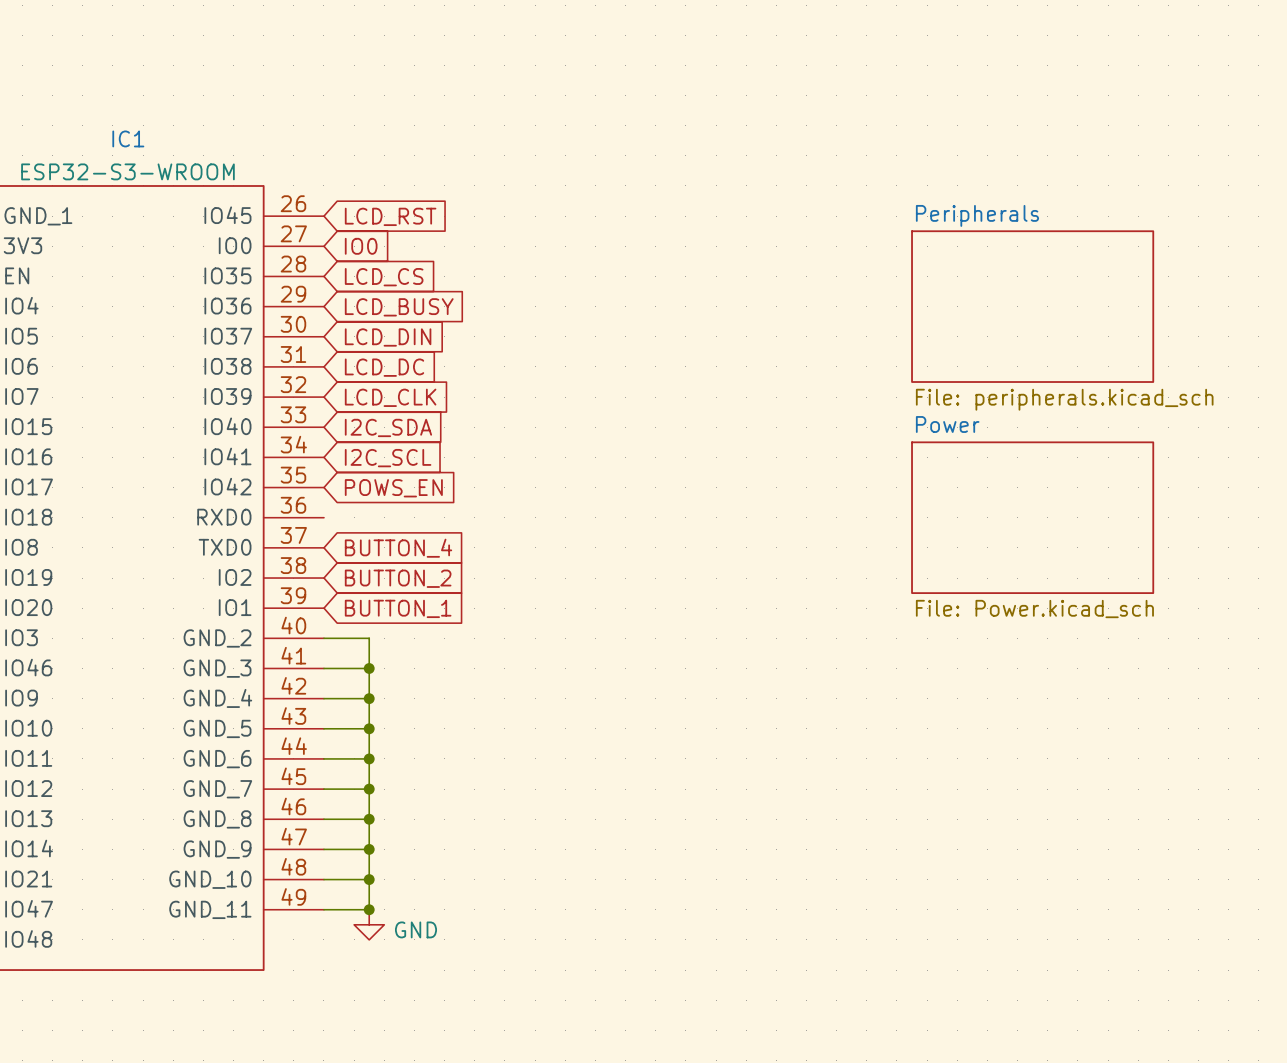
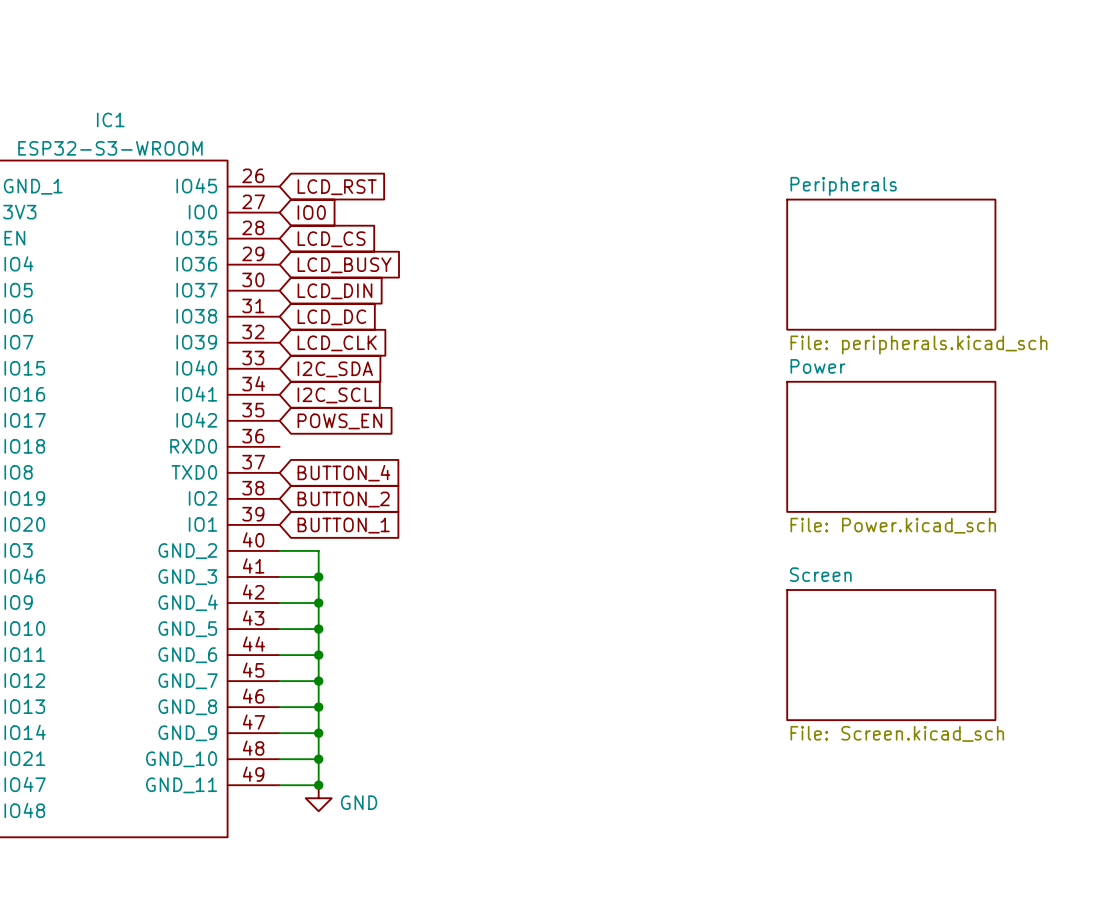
sheet Screen: none -> File: Screen.kicad_sch (891, 655)

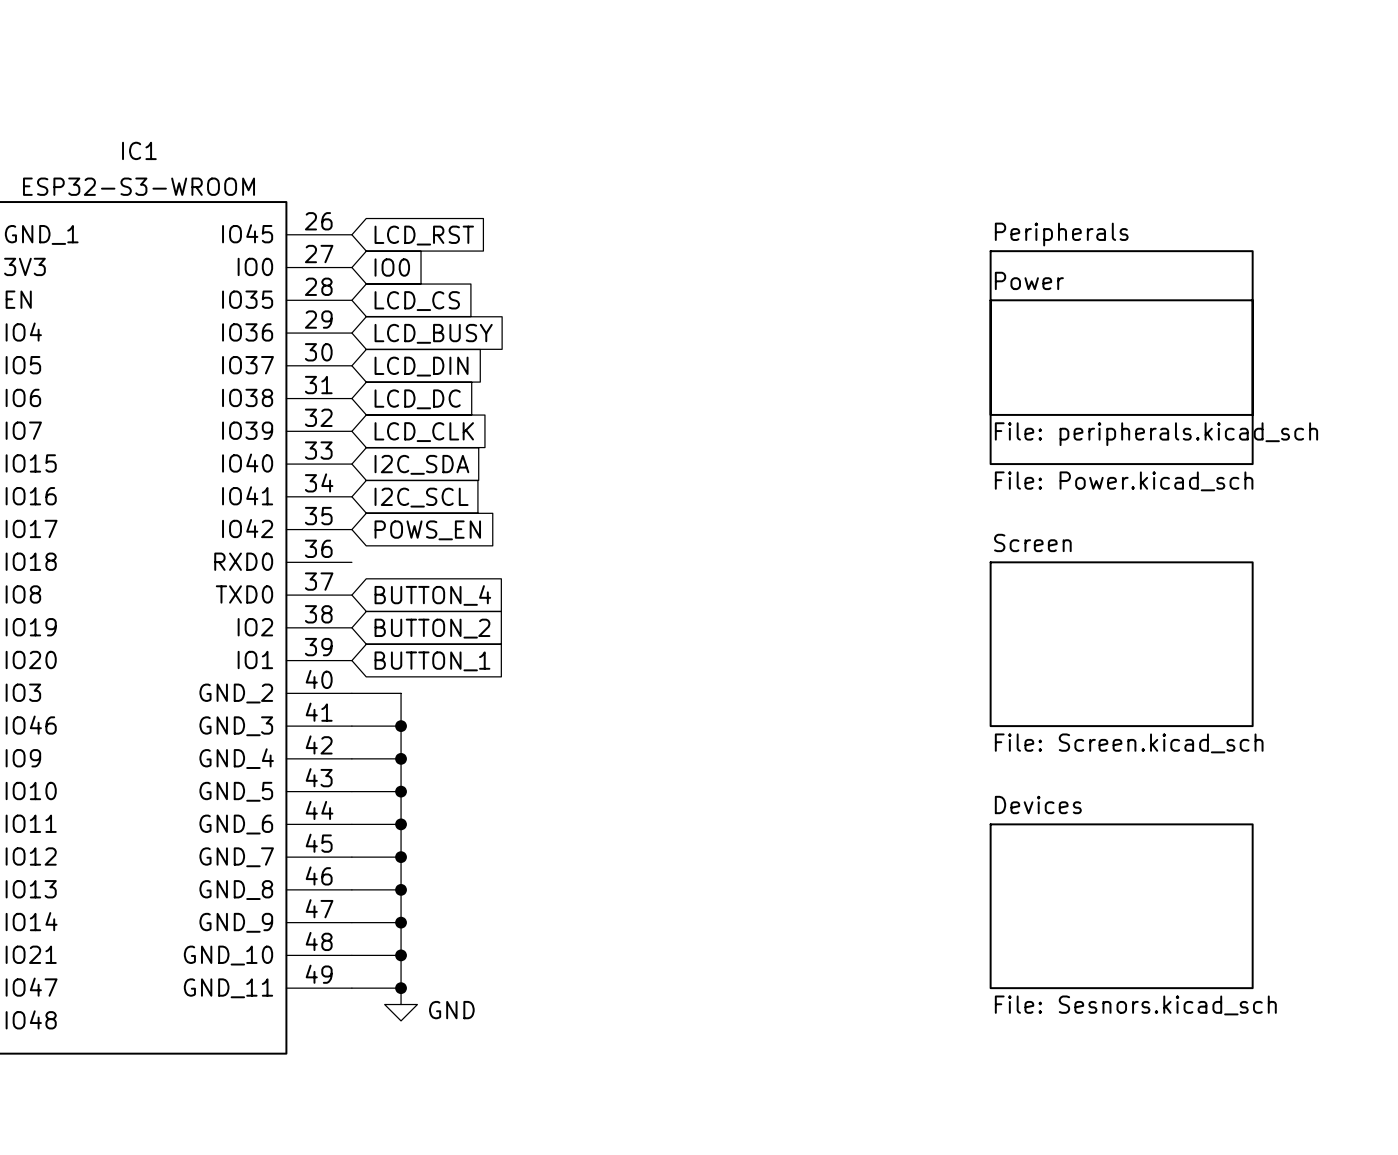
sheet Power position: (891, 446) -> (1121, 382)
sheet Screen position: (891, 655) -> (1121, 644)
sheet Devices: none -> File: Sesnors.kicad_sch (1121, 906)

